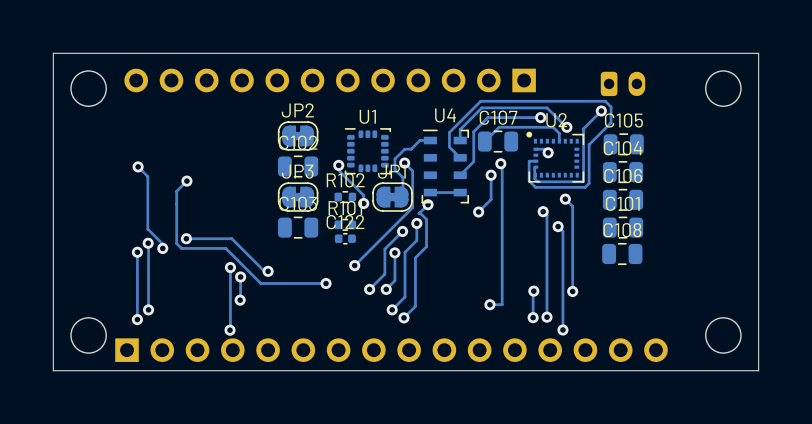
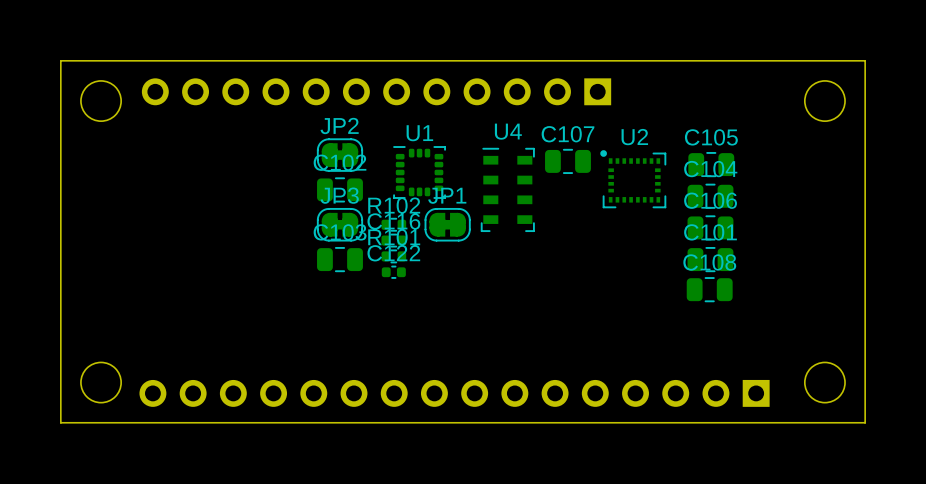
part: (623, 83) -> none
track: (601, 110) (583, 128) -> none
via: (601, 110) -> none
track: (540, 117) (487, 117) (473, 131) (473, 161) (460, 175) -> none
via: (540, 117) -> none
track: (566, 127) (547, 107) (481, 107) (460, 129) (460, 140) -> none
via: (566, 127) -> none
track: (583, 128) (583, 181) -> none
track: (430, 140) (419, 140) (411, 149) (404, 149) (394, 159) (394, 169) (402, 177) (401, 197) -> none
track: (559, 141) (559, 133) (553, 127) (499, 127) (484, 141) -> none
track: (535, 149) (544, 149) (548, 152) -> none
via: (548, 152) -> none
track: (460, 157) (449, 147) (449, 132) (480, 101) (605, 101) (611, 106) (611, 122) (589, 144) (589, 183) (585, 187) (535, 187) (529, 180) (529, 161) (535, 161) -> none
track: (404, 163) (412, 171) (412, 207) (354, 265) -> none
via: (404, 163) -> none
track: (500, 163) (502, 304) (489, 304) -> none
via: (500, 163) -> none
track: (338, 165) (339, 170) (363, 195) (363, 203) -> none
via: (338, 165) -> none
track: (138, 166) (147, 176) (147, 229) (162, 244) (162, 248) -> none
via: (138, 166) -> none
track: (535, 167) (534, 178) (537, 181) (583, 181) -> none
track: (491, 175) (491, 199) (478, 212) -> none
via: (491, 175) -> none
track: (186, 181) (176, 191) (176, 243) (181, 248) (225, 248) (260, 283) (326, 283) -> none
via: (186, 181) -> none
track: (460, 192) (430, 192) -> none
track: (565, 199) (572, 206) (572, 291) -> none
via: (565, 199) -> none
via: (363, 203) -> none
track: (428, 204) (418, 213) (426, 219) (426, 246) (415, 257) (415, 306) (403, 317) -> none
via: (428, 204) -> none
C116: none -> (393, 240)
track: (543, 211) (546, 215) (546, 317) -> none
via: (543, 211) -> none
via: (478, 212) -> none
track: (416, 223) (416, 240) (405, 252) (405, 297) (392, 309) -> none
via: (416, 223) -> none
track: (558, 226) (562, 231) (562, 330) -> none
via: (558, 226) -> none
track: (402, 231) (384, 249) (384, 274) (369, 289) -> none
via: (402, 231) -> none
track: (186, 238) (231, 238) (264, 271) (268, 271) -> none
via: (186, 238) -> none
track: (148, 243) (148, 309) -> none
via: (148, 243) -> none
via: (162, 248) -> none
track: (137, 252) (137, 319) -> none
via: (137, 252) -> none
track: (394, 252) (394, 280) (386, 289) -> none
via: (394, 252) -> none
via: (354, 265) -> none
track: (230, 267) (230, 330) -> none
via: (230, 267) -> none
via: (268, 271) -> none
track: (240, 276) (240, 300) -> none
via: (240, 276) -> none
via: (326, 283) -> none
via: (369, 289) -> none
via: (386, 289) -> none
track: (533, 291) (533, 317) -> none
via: (533, 291) -> none
via: (572, 291) -> none
via: (240, 300) -> none
via: (489, 304) -> none
via: (148, 309) -> none
via: (392, 309) -> none
via: (403, 317) -> none
via: (533, 317) -> none
via: (546, 317) -> none
via: (137, 319) -> none
via: (230, 330) -> none
via: (562, 330) -> none
part rotation: 0° (391, 350) -> 180° (454, 393)

